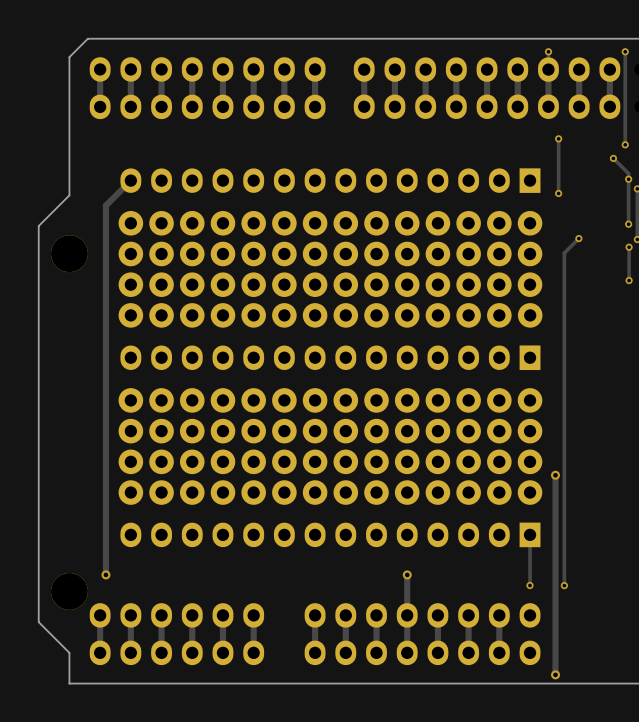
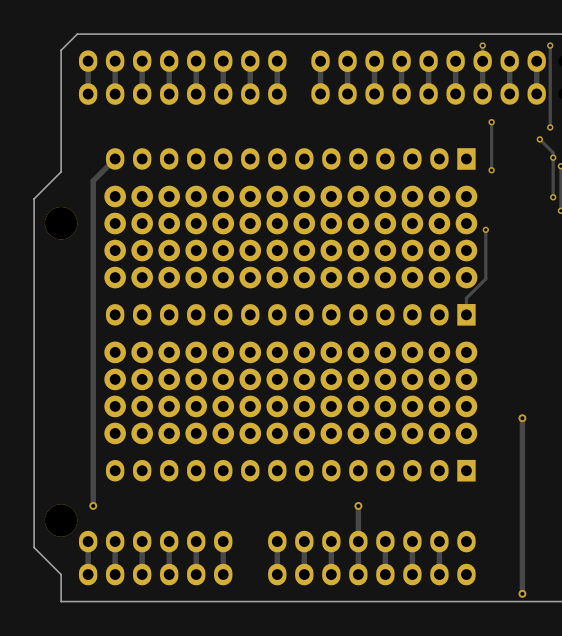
track: (578, 238) (564, 253) (564, 585) -> none
via position: (578, 238) -> (485, 229)
track: (629, 247) (629, 280) -> none
via: (629, 247) -> none
track: none -> (485, 229) (485, 278) (466, 298) (466, 314)
via: (629, 280) -> none
track: (555, 475) (555, 674) -> (522, 418) (522, 593)
via position: (555, 475) -> (522, 418)
track: (530, 534) (530, 585) -> none
via: (529, 585) -> none
via: (564, 585) -> none
via position: (555, 674) -> (522, 593)

